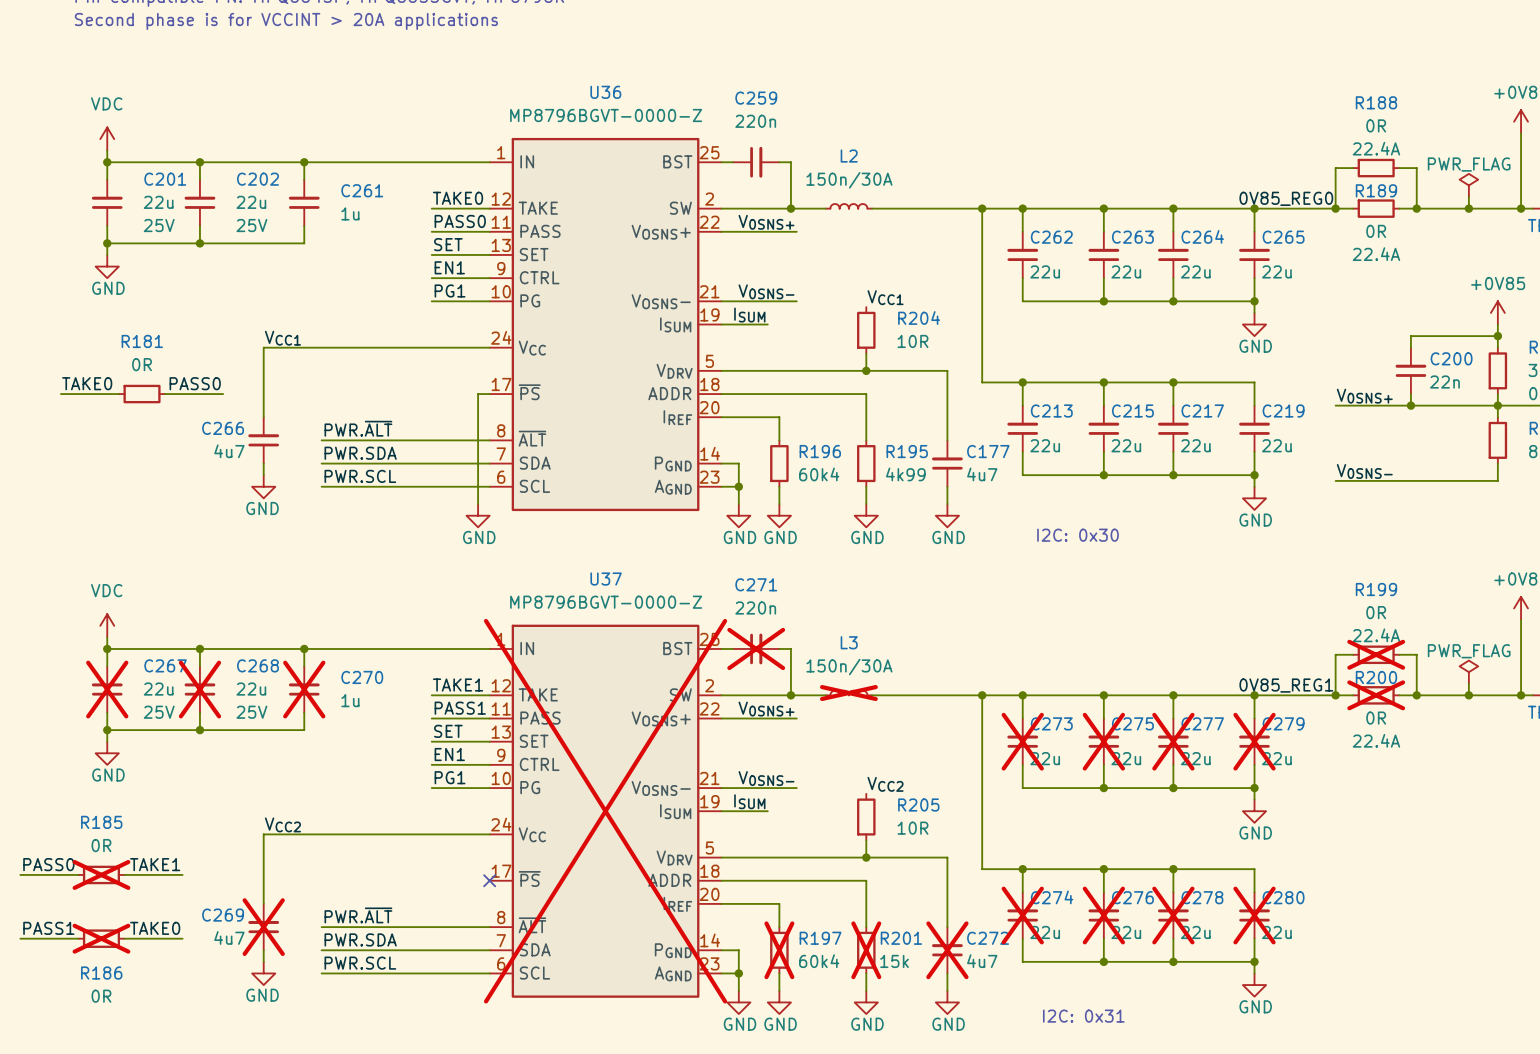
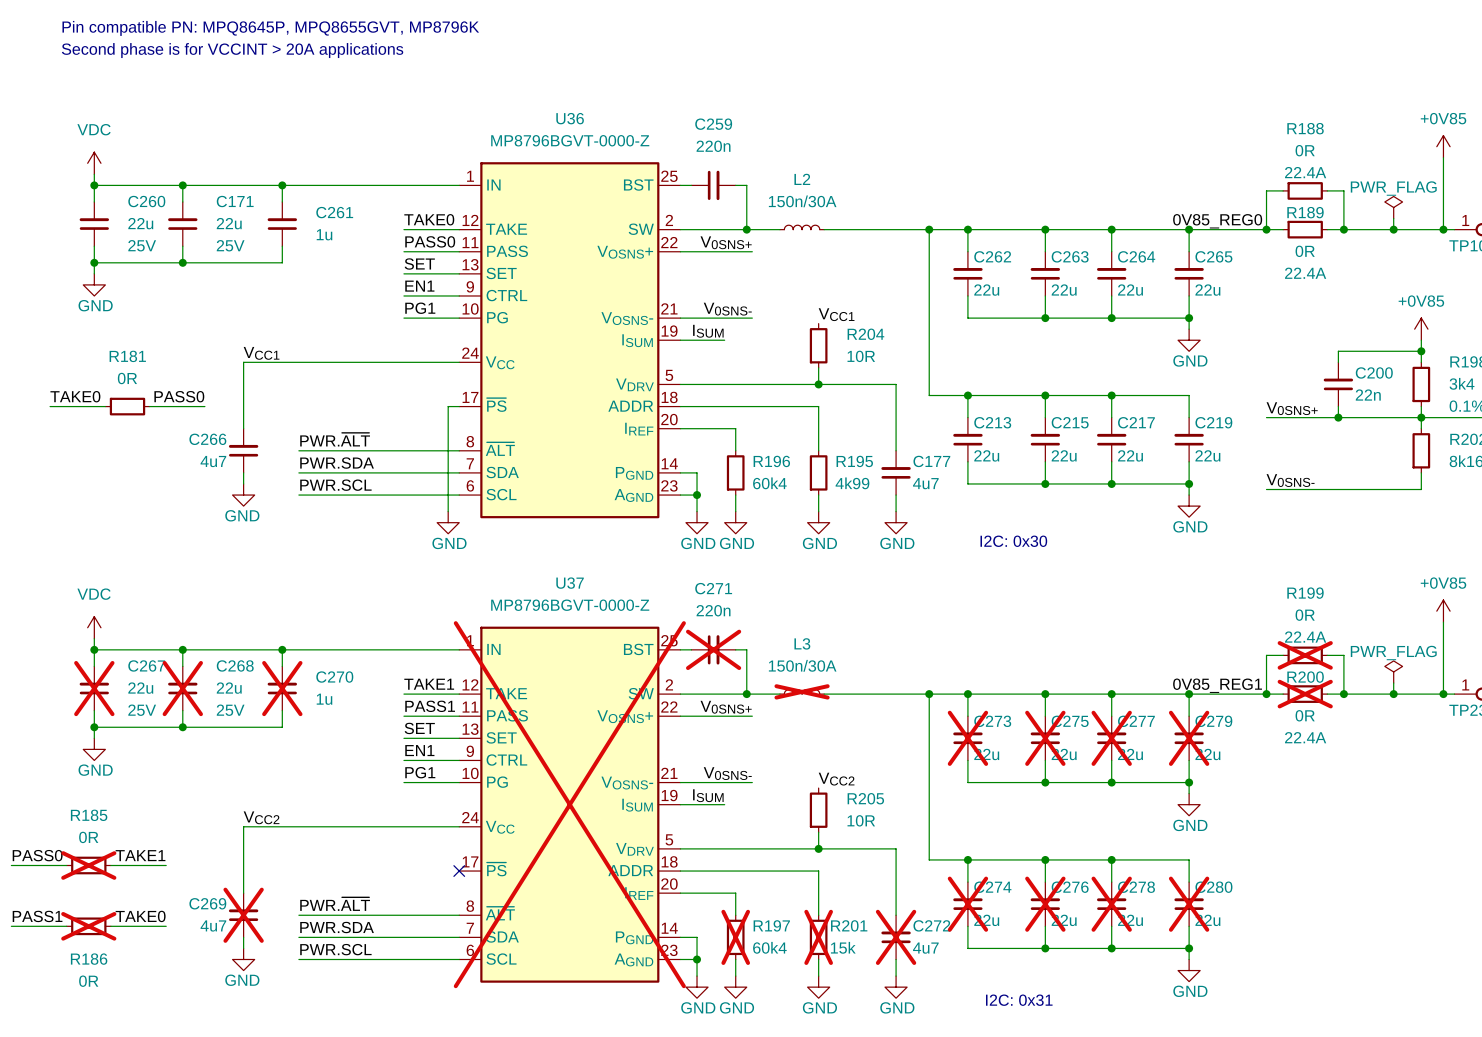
C201 name: C201 (165, 179) -> C260 (146, 201)
C202 name: C202 (257, 179) -> C171 (235, 201)

